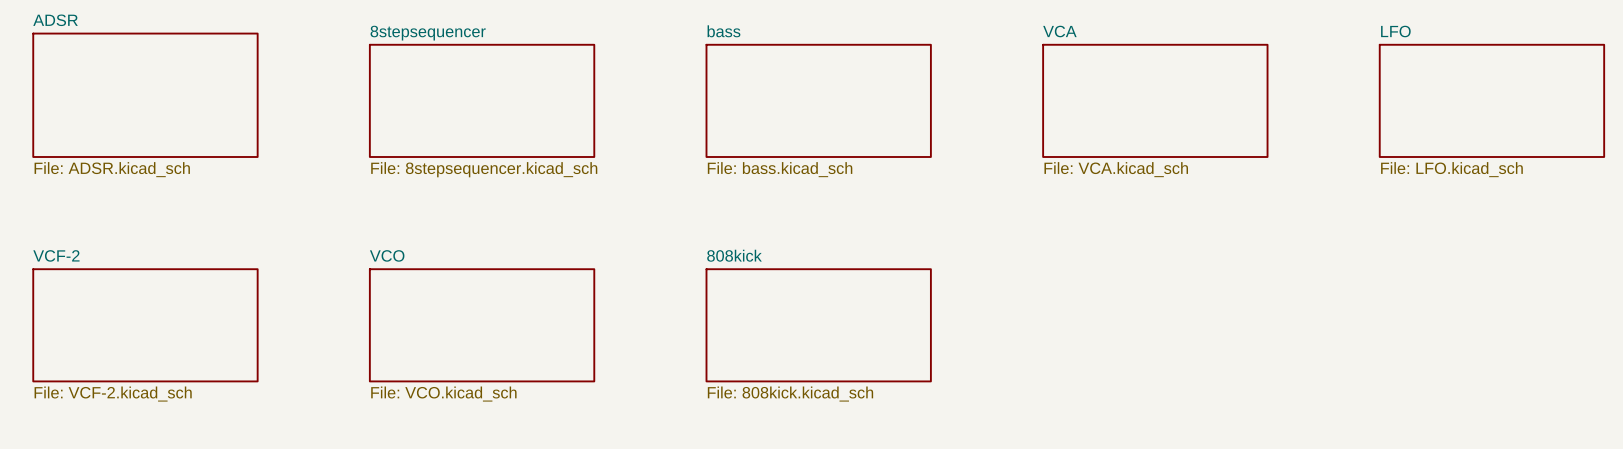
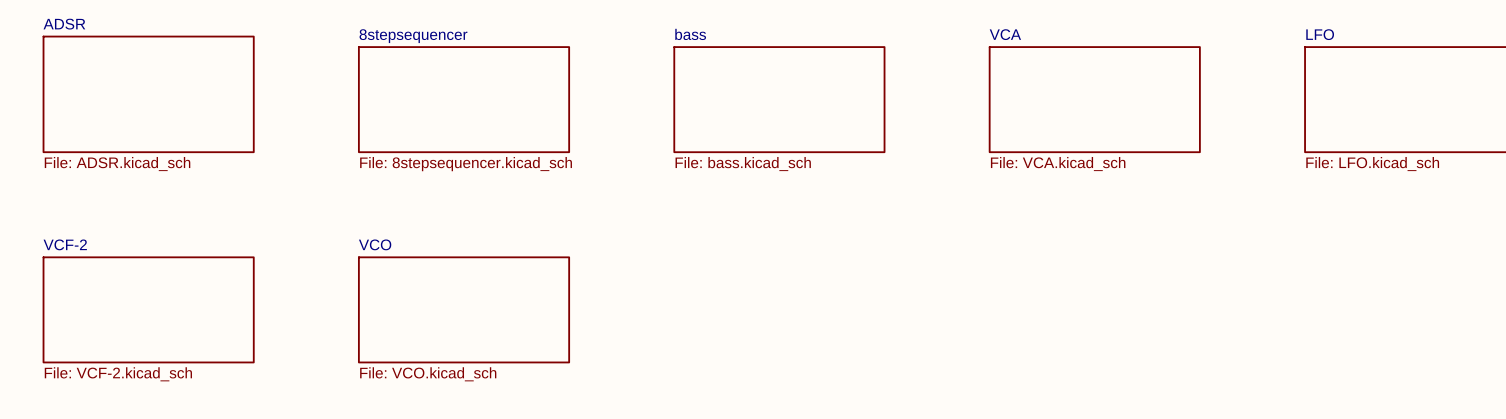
sheet 808kick: File: 808kick.kicad_sch (818, 325) -> none

